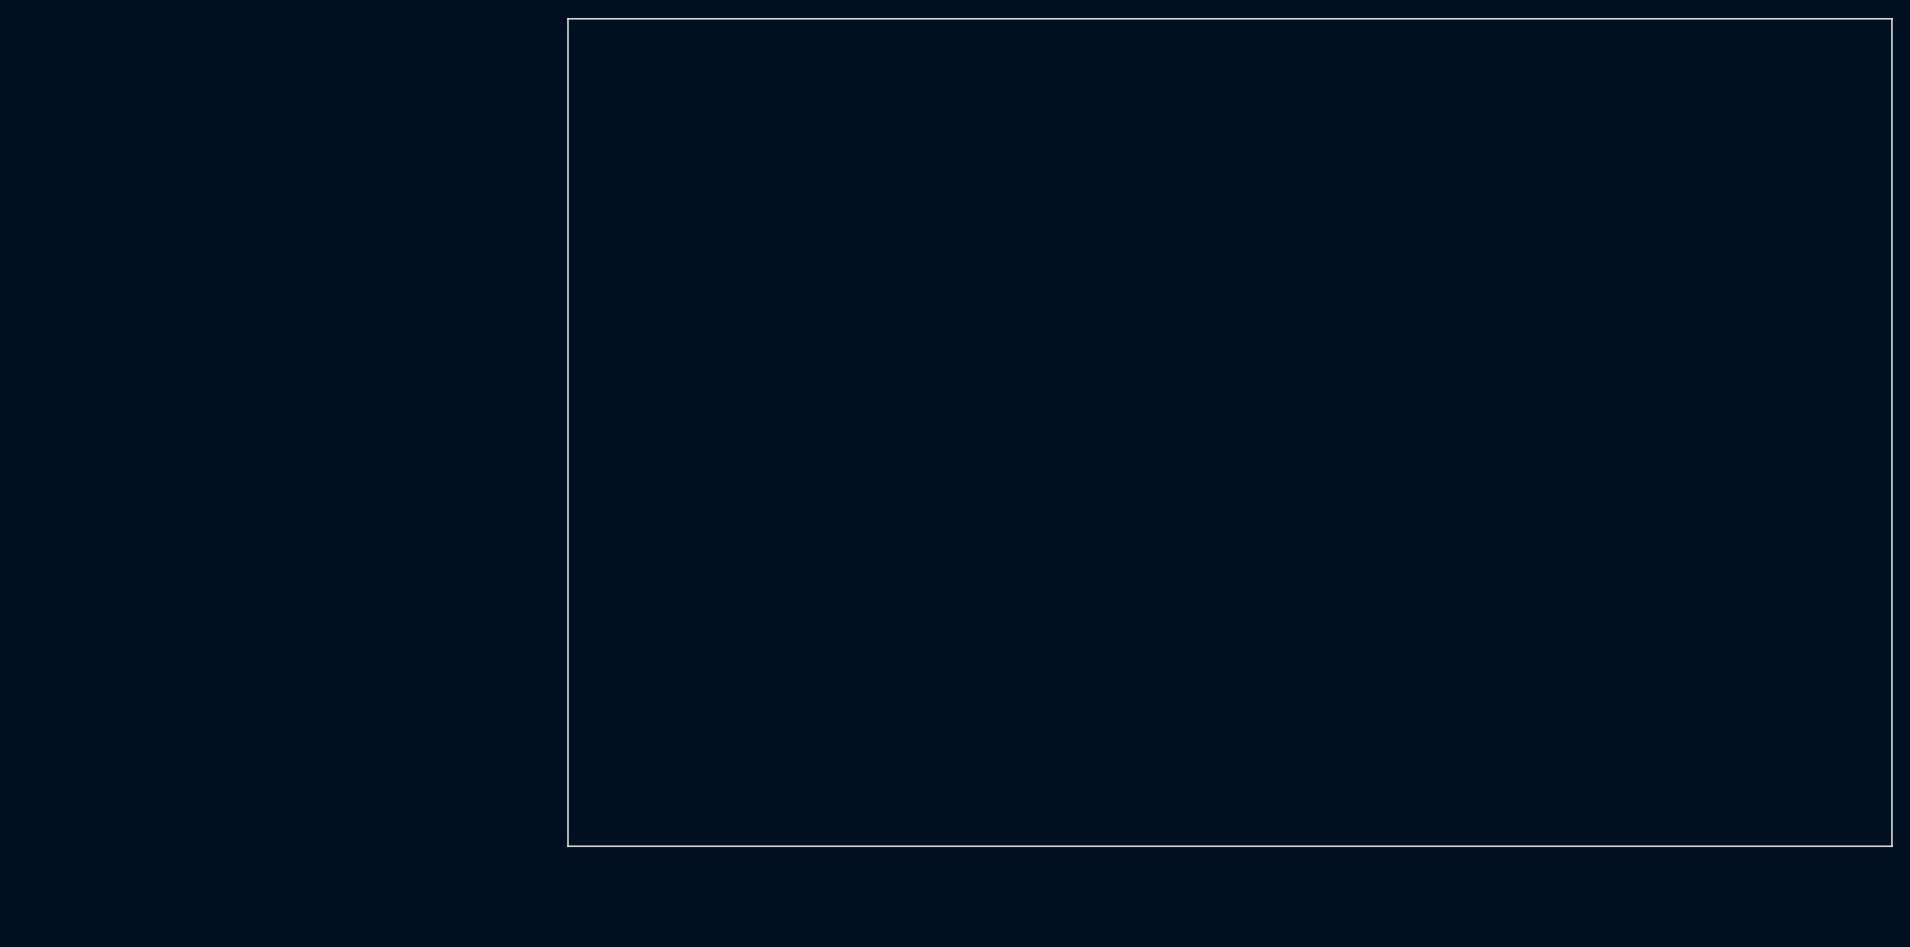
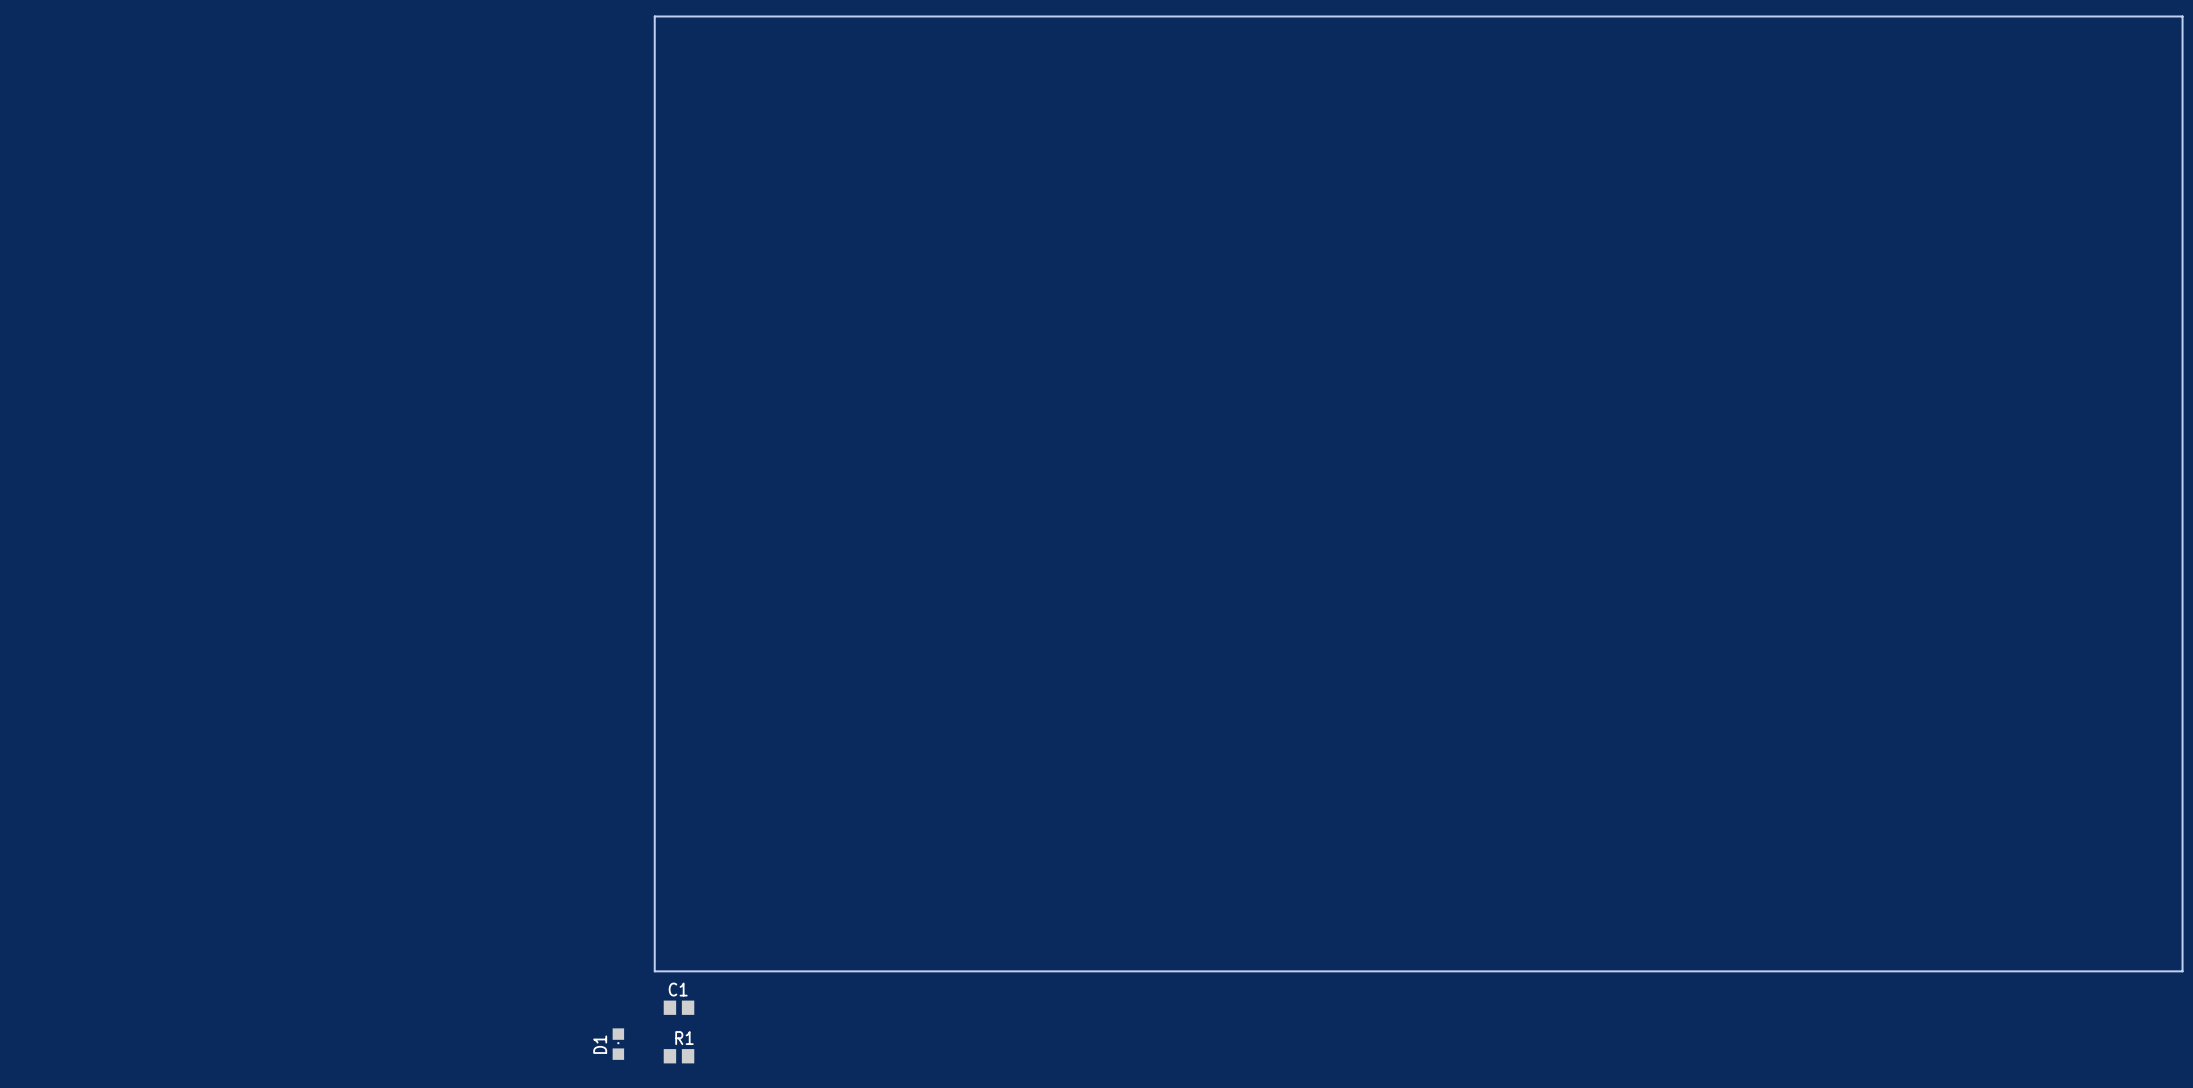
C1: none -> (679, 1007)
D1: none -> (618, 1044)
R1: none -> (679, 1056)

